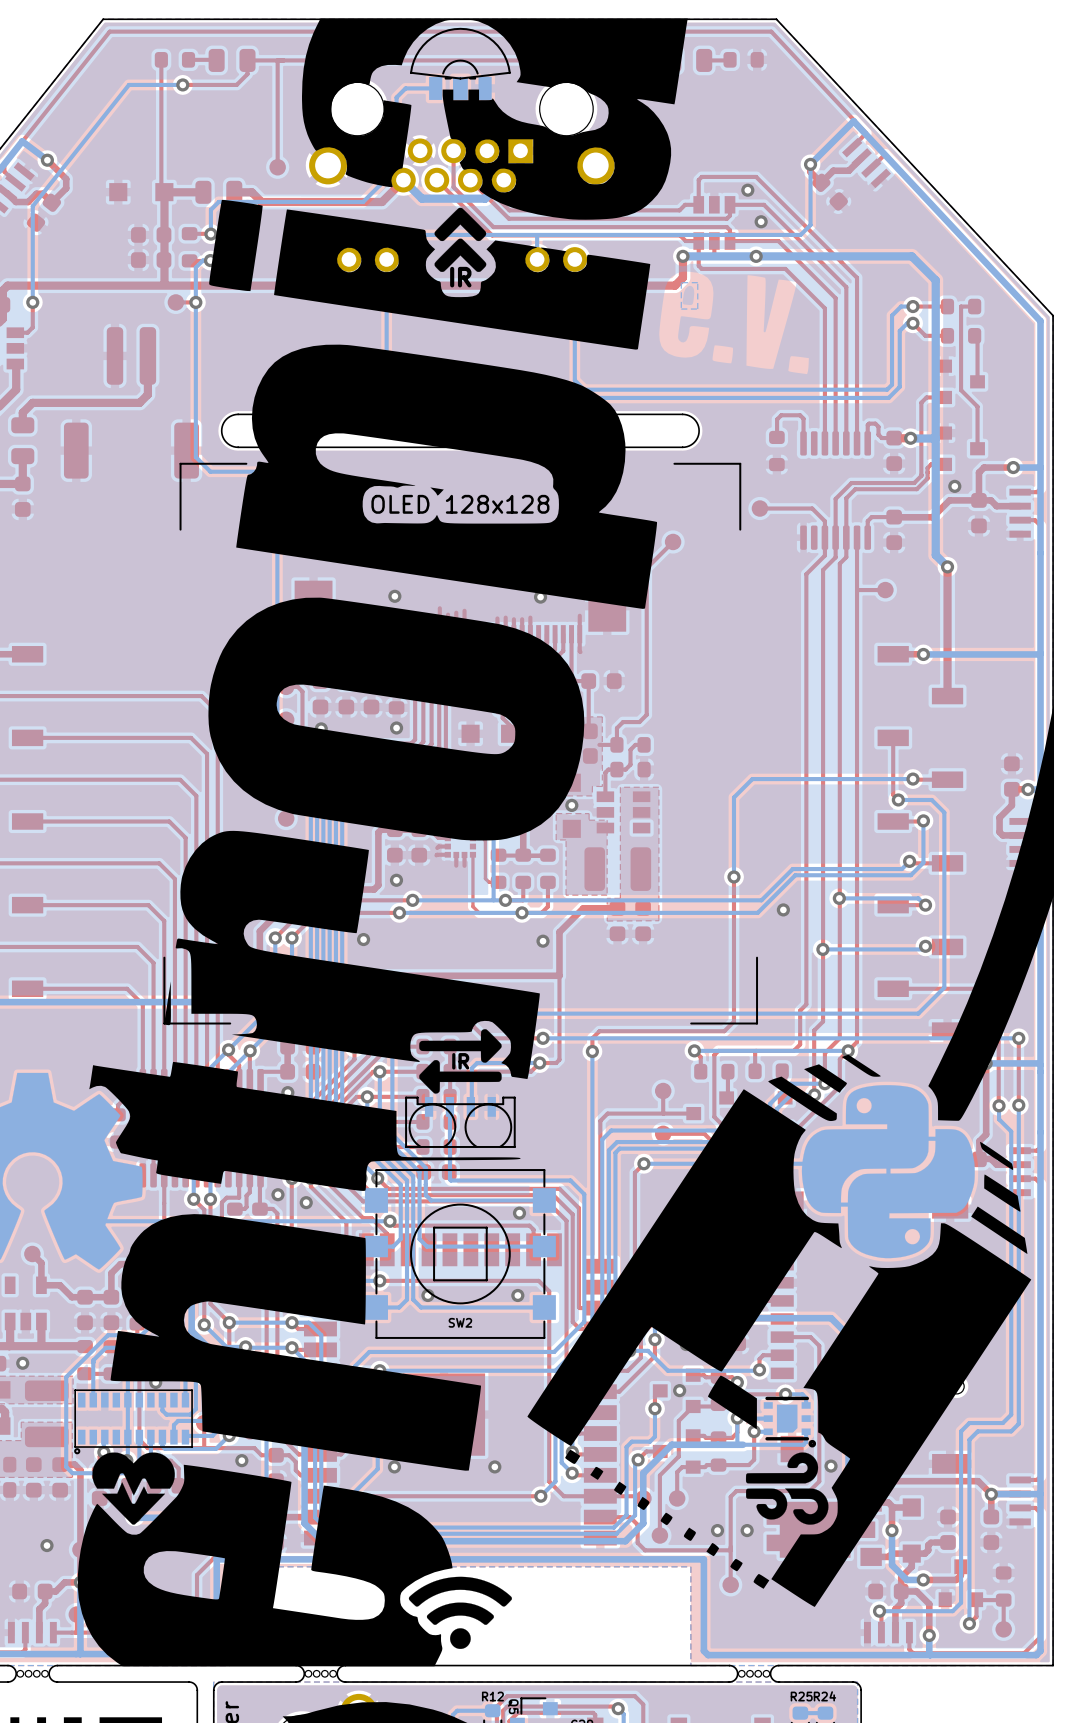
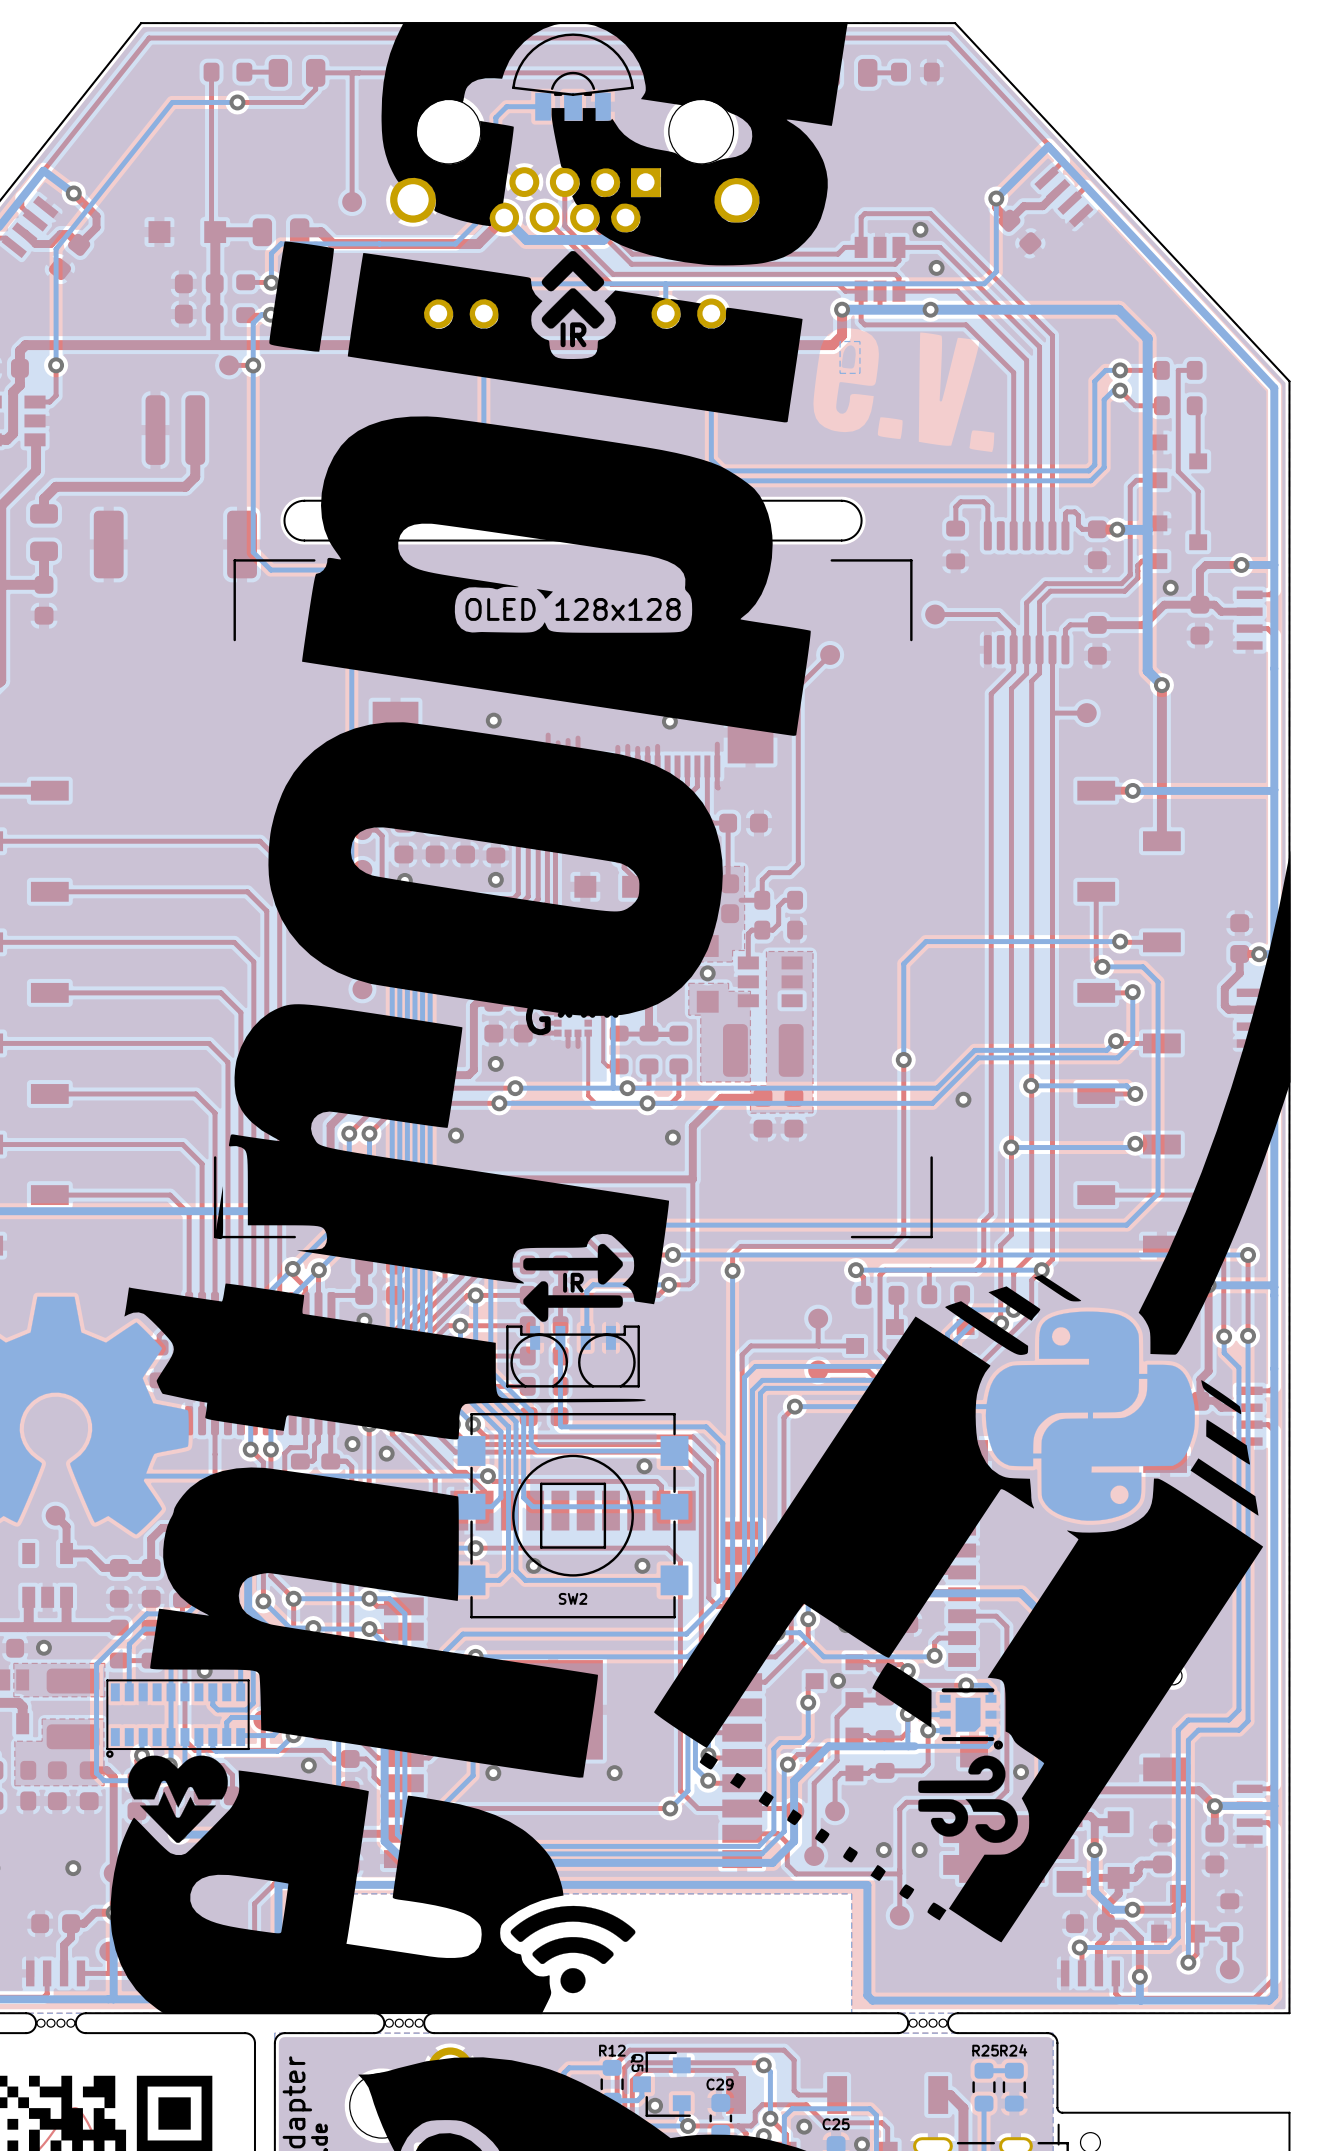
drawing: [77, 18, 1055, 1667] -> none
part: none -> (700, 1018)

